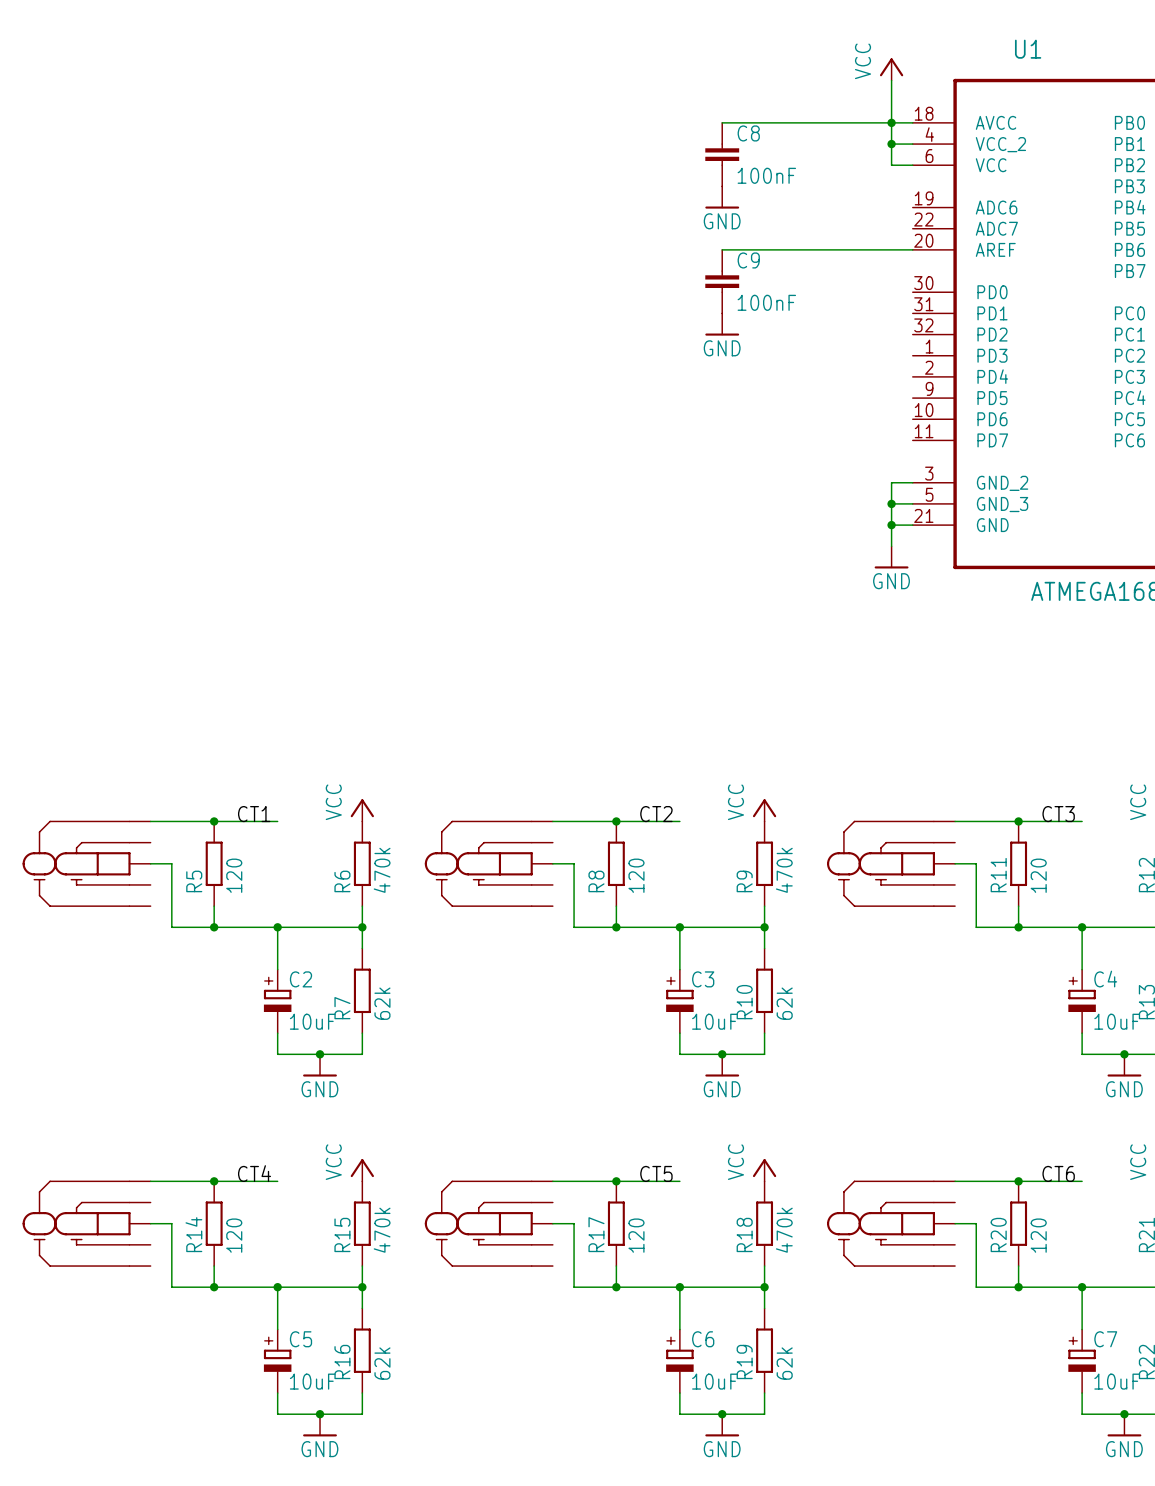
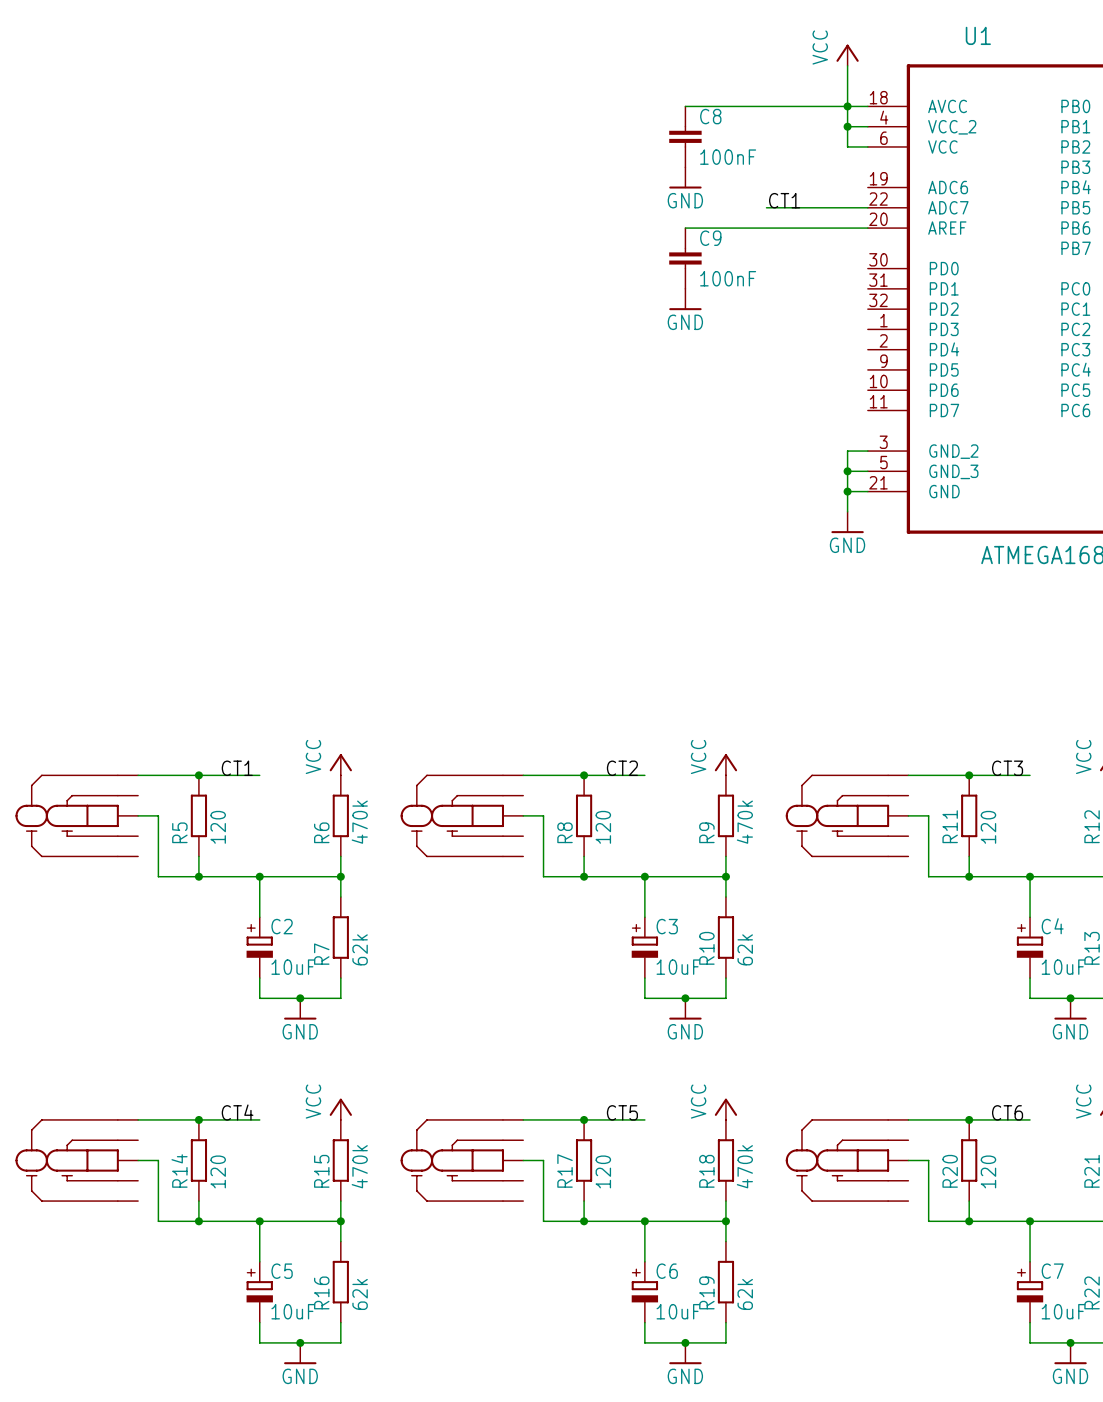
label: none -> CT1 (784, 200)
wire: none -> (766, 207) (867, 207)

